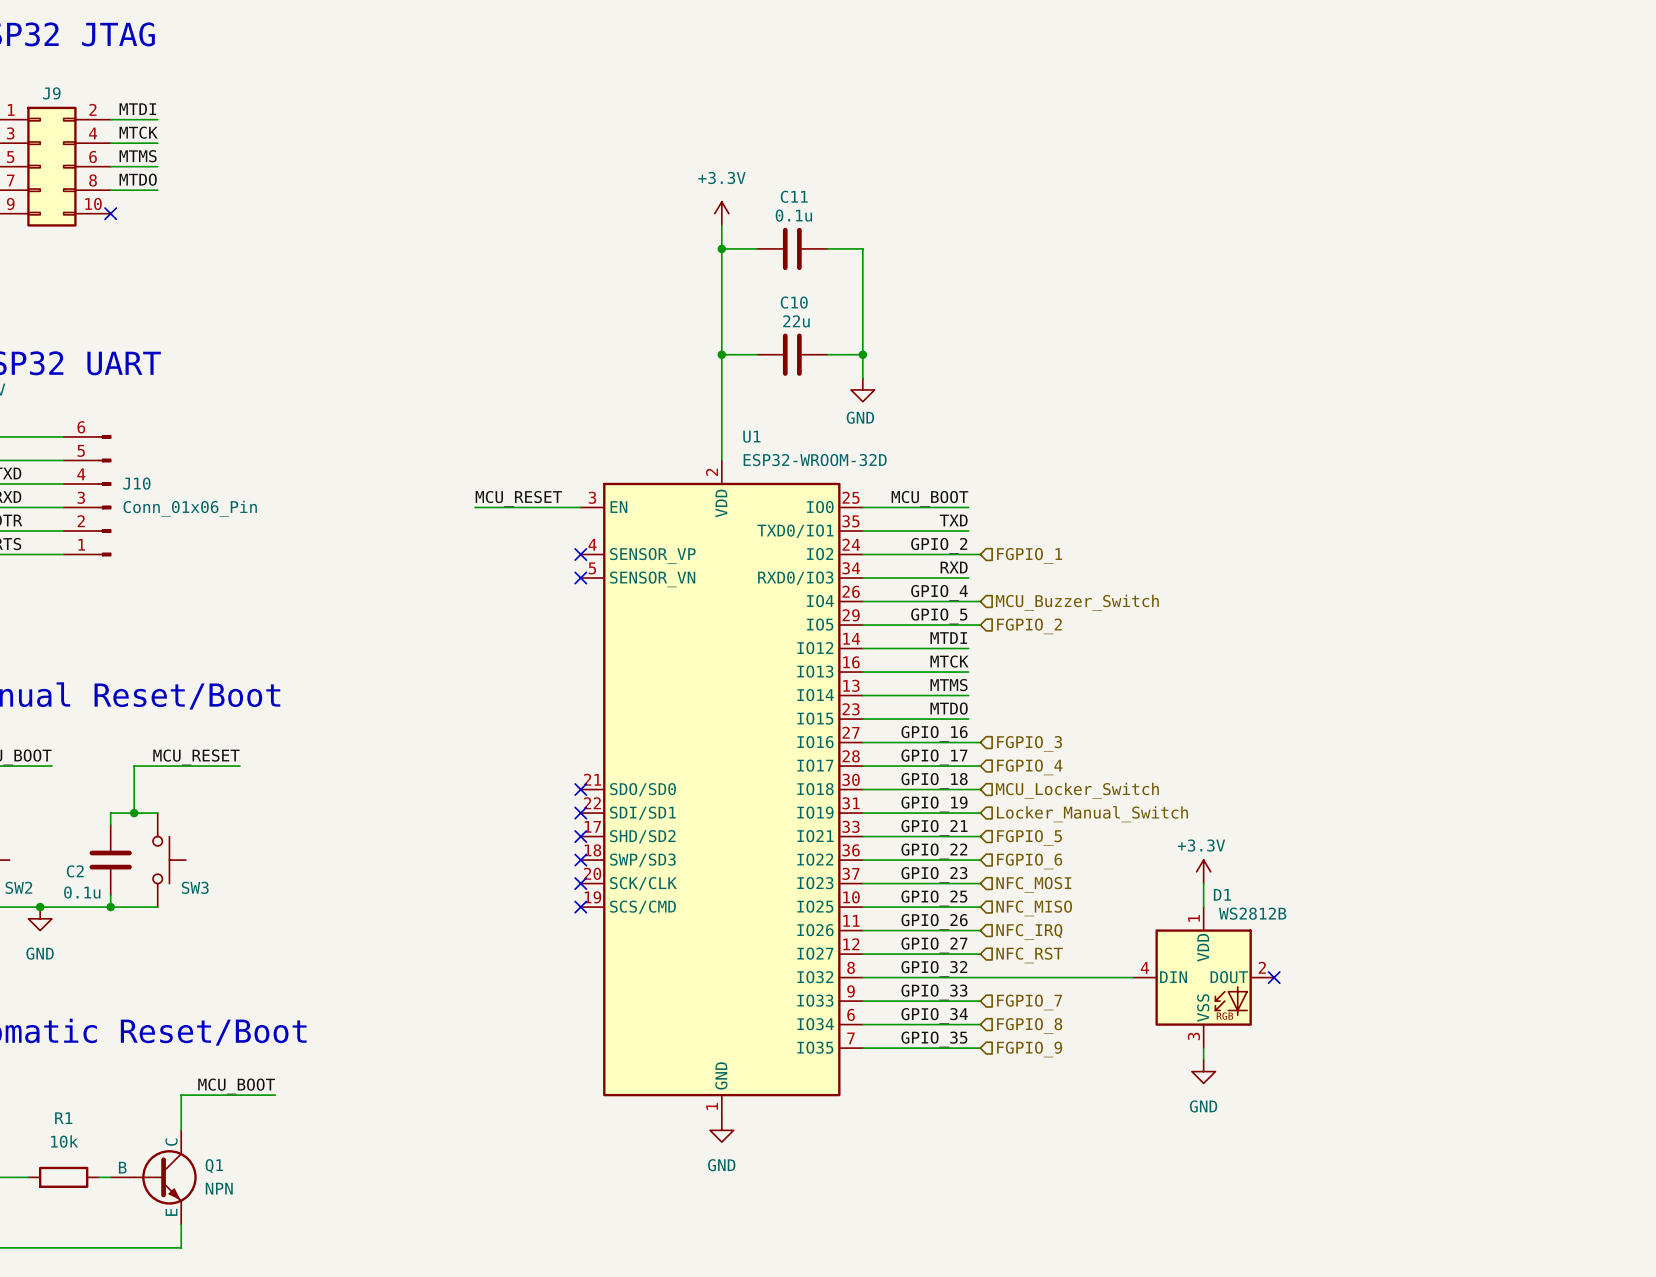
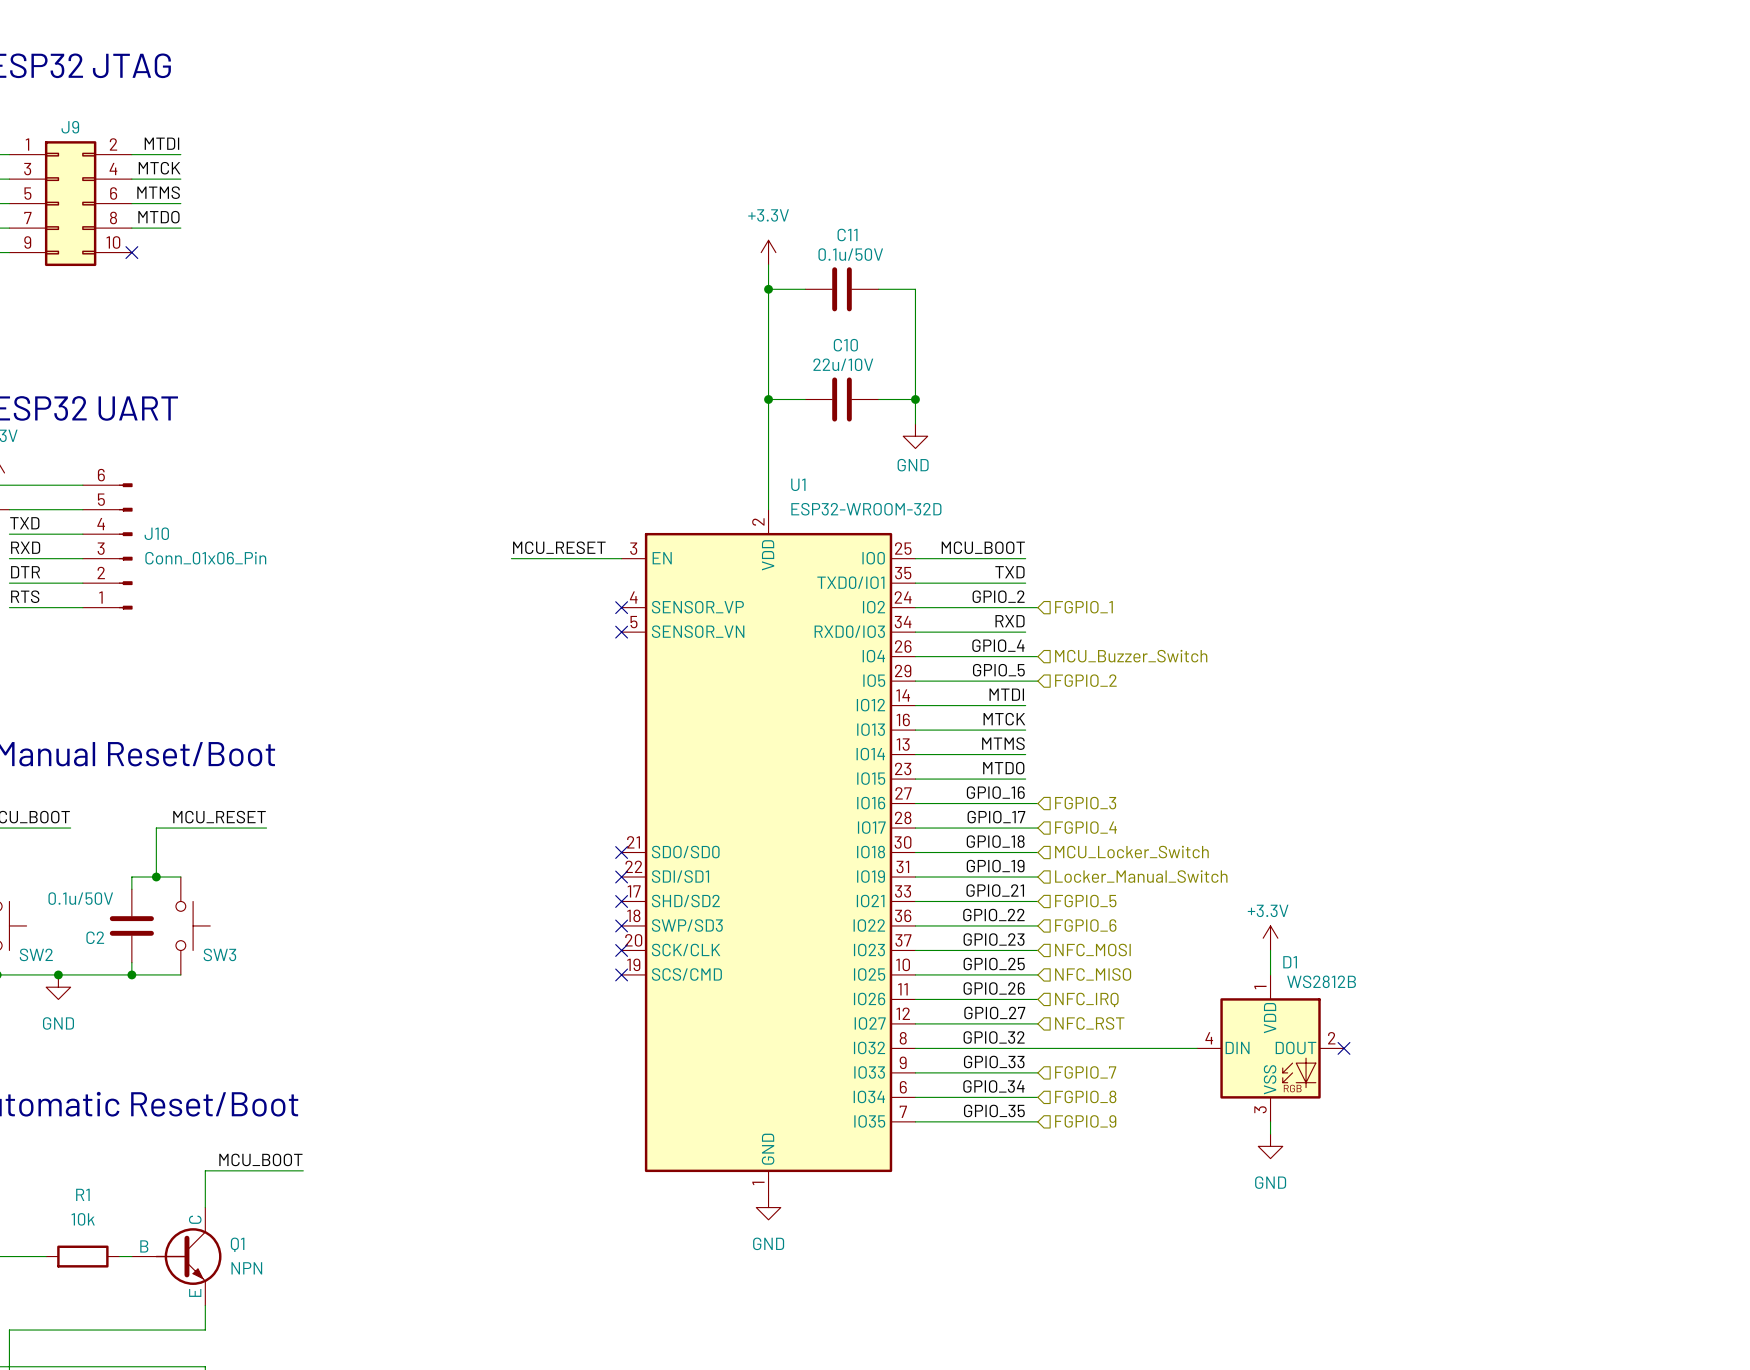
C11 value: 0.1u (793, 215) -> 0.1u/50V (850, 254)
C10 value: 22u (796, 321) -> 22u/10V (843, 364)
C2 value: 0.1u (82, 892) -> 0.1u/50V (80, 898)

